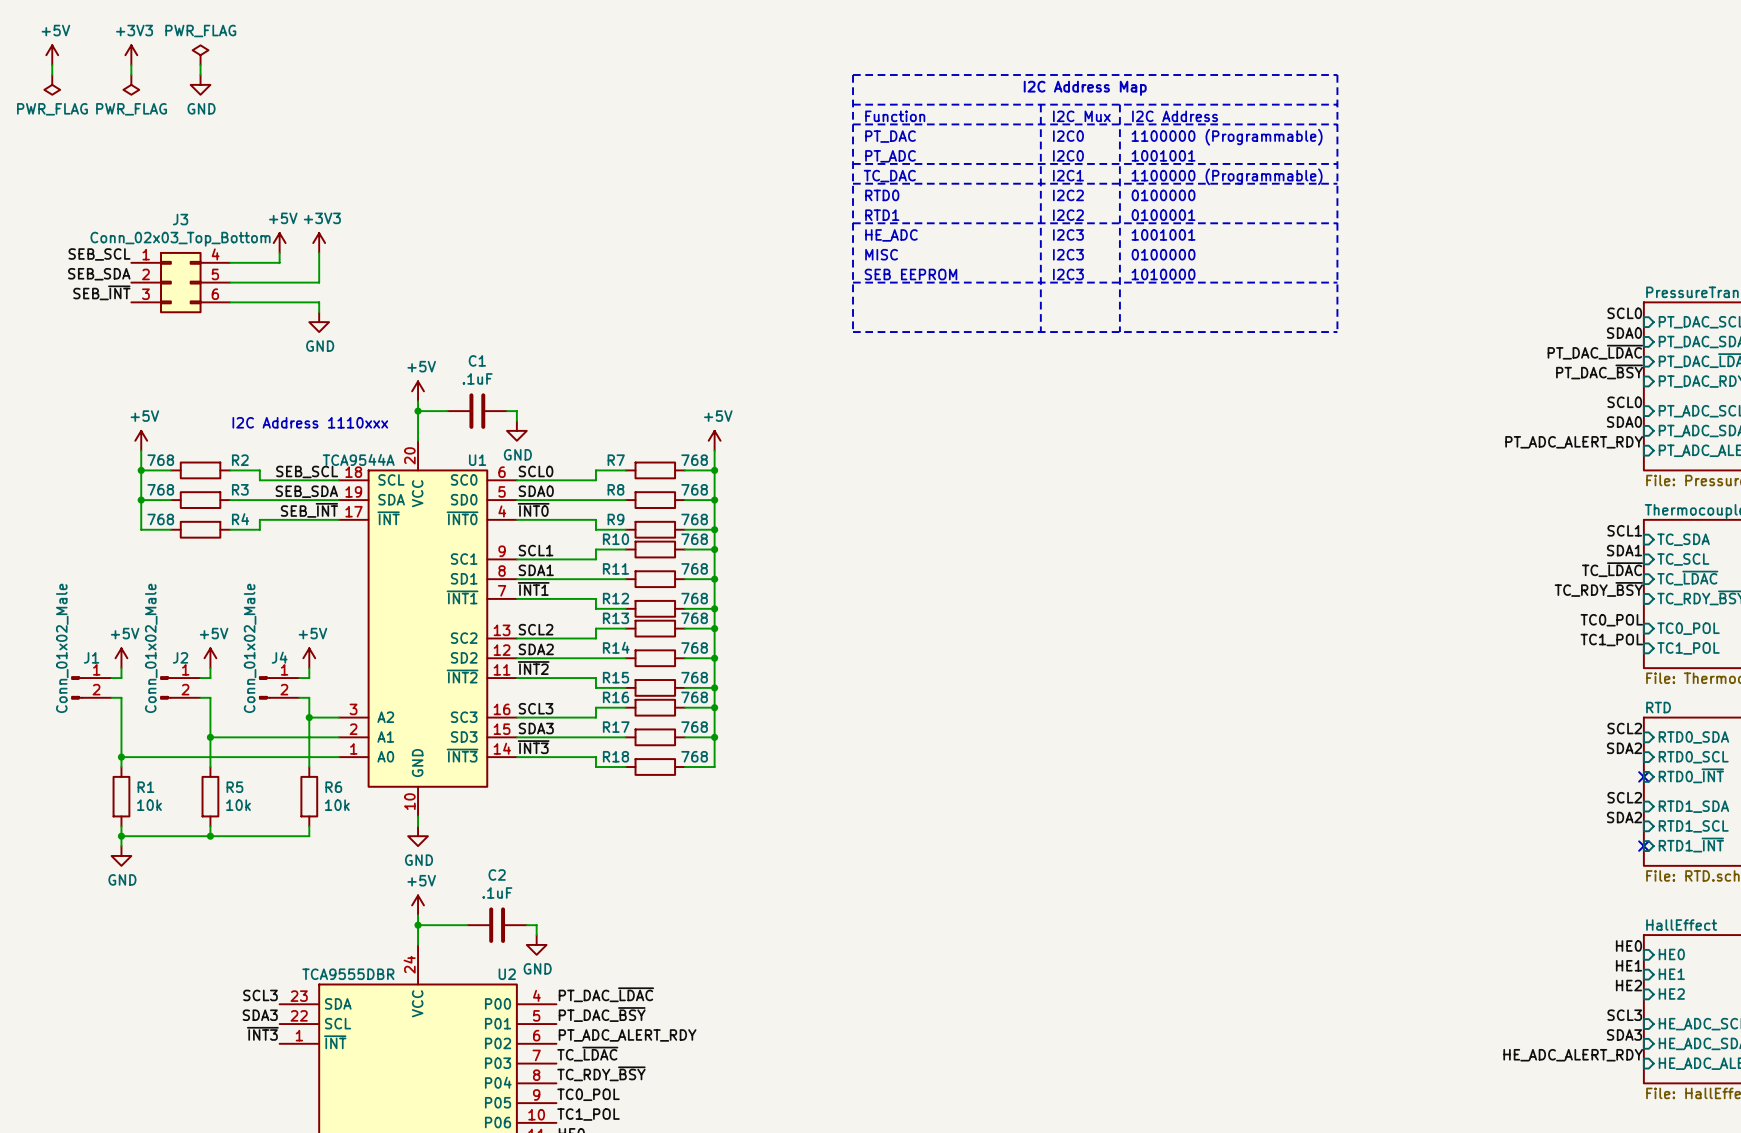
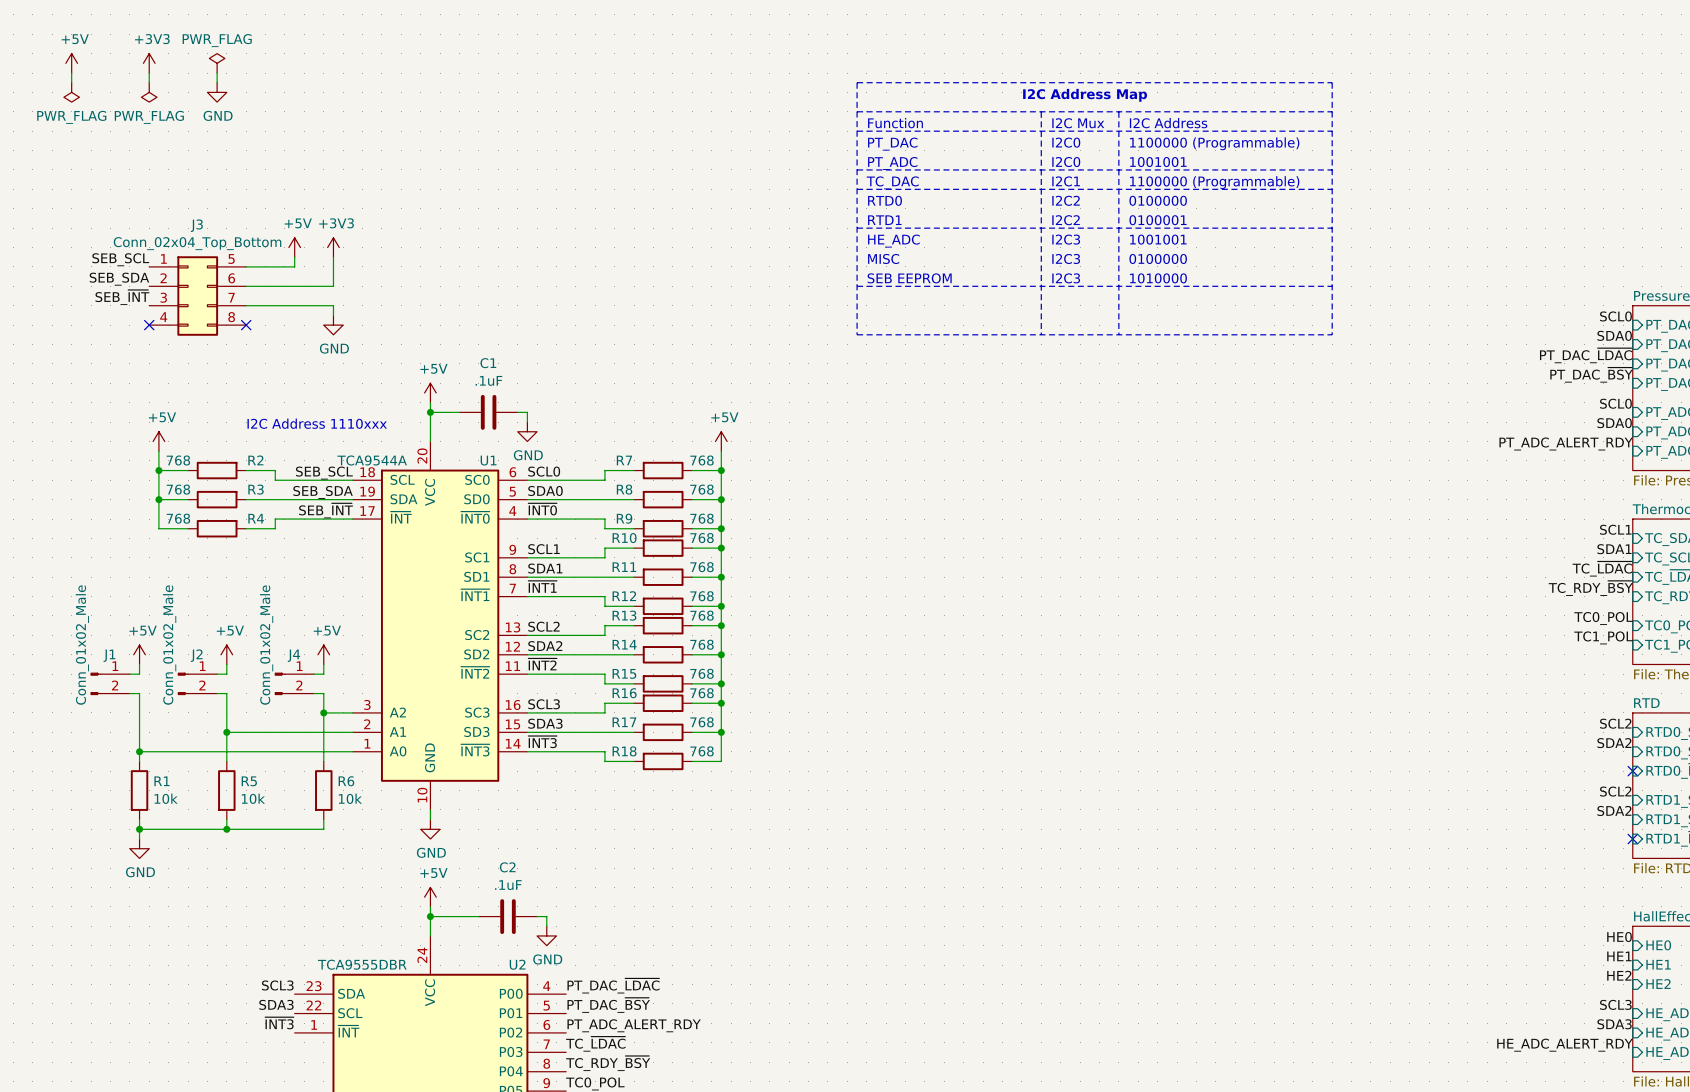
J3 value: Conn_02x03_Top_Bottom (180, 239) -> Conn_02x04_Top_Bottom (197, 243)
J3 symbol: [131, 251, 231, 314] -> [149, 256, 247, 336]
no-connect mark: none -> (149, 325)
no-connect mark: none -> (246, 325)

